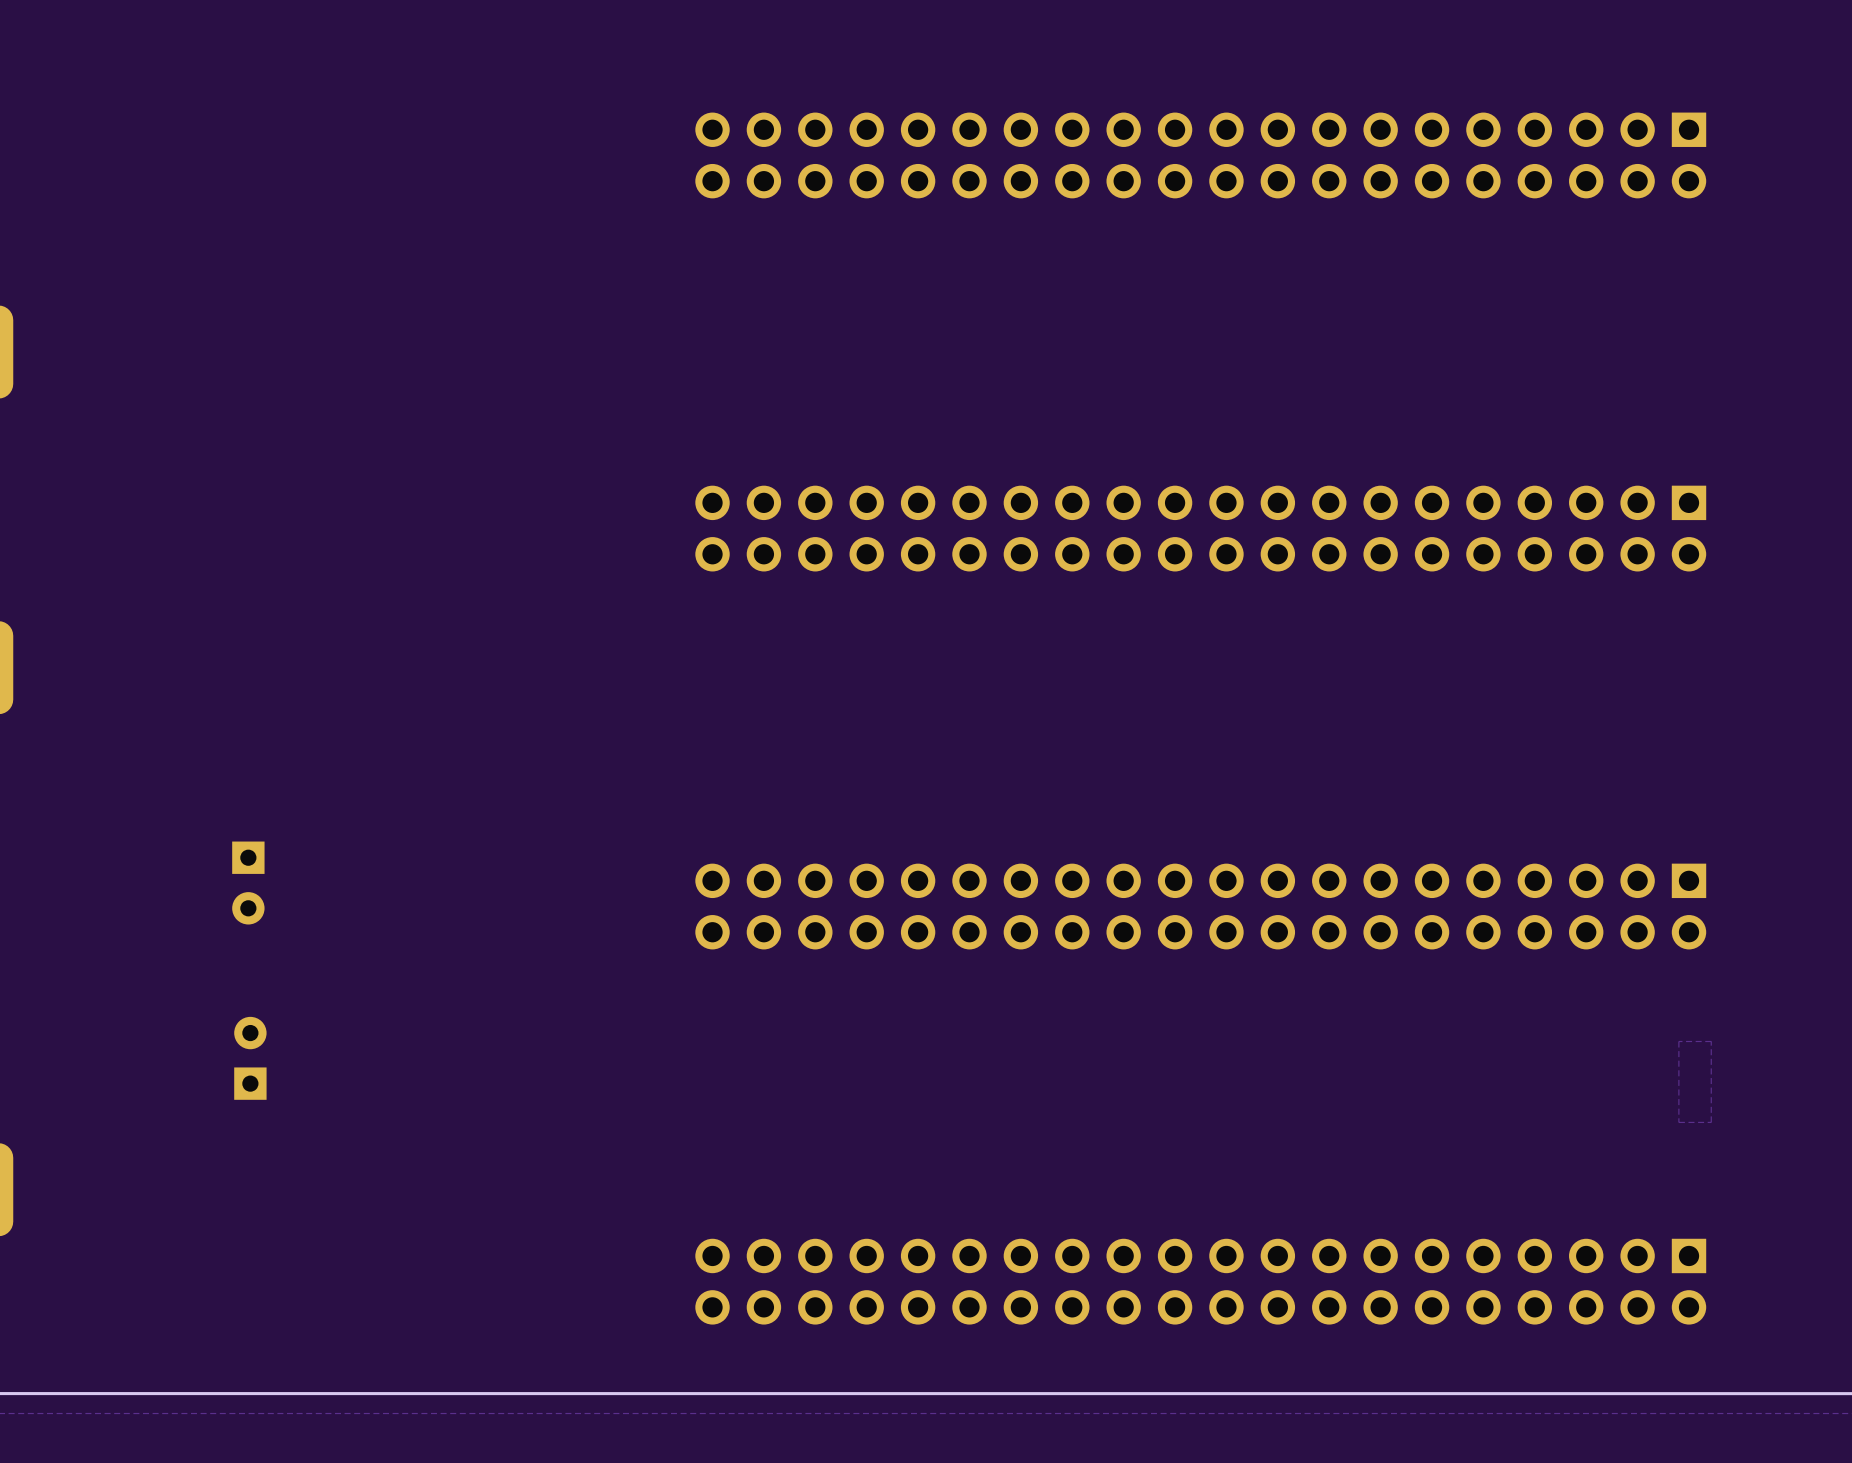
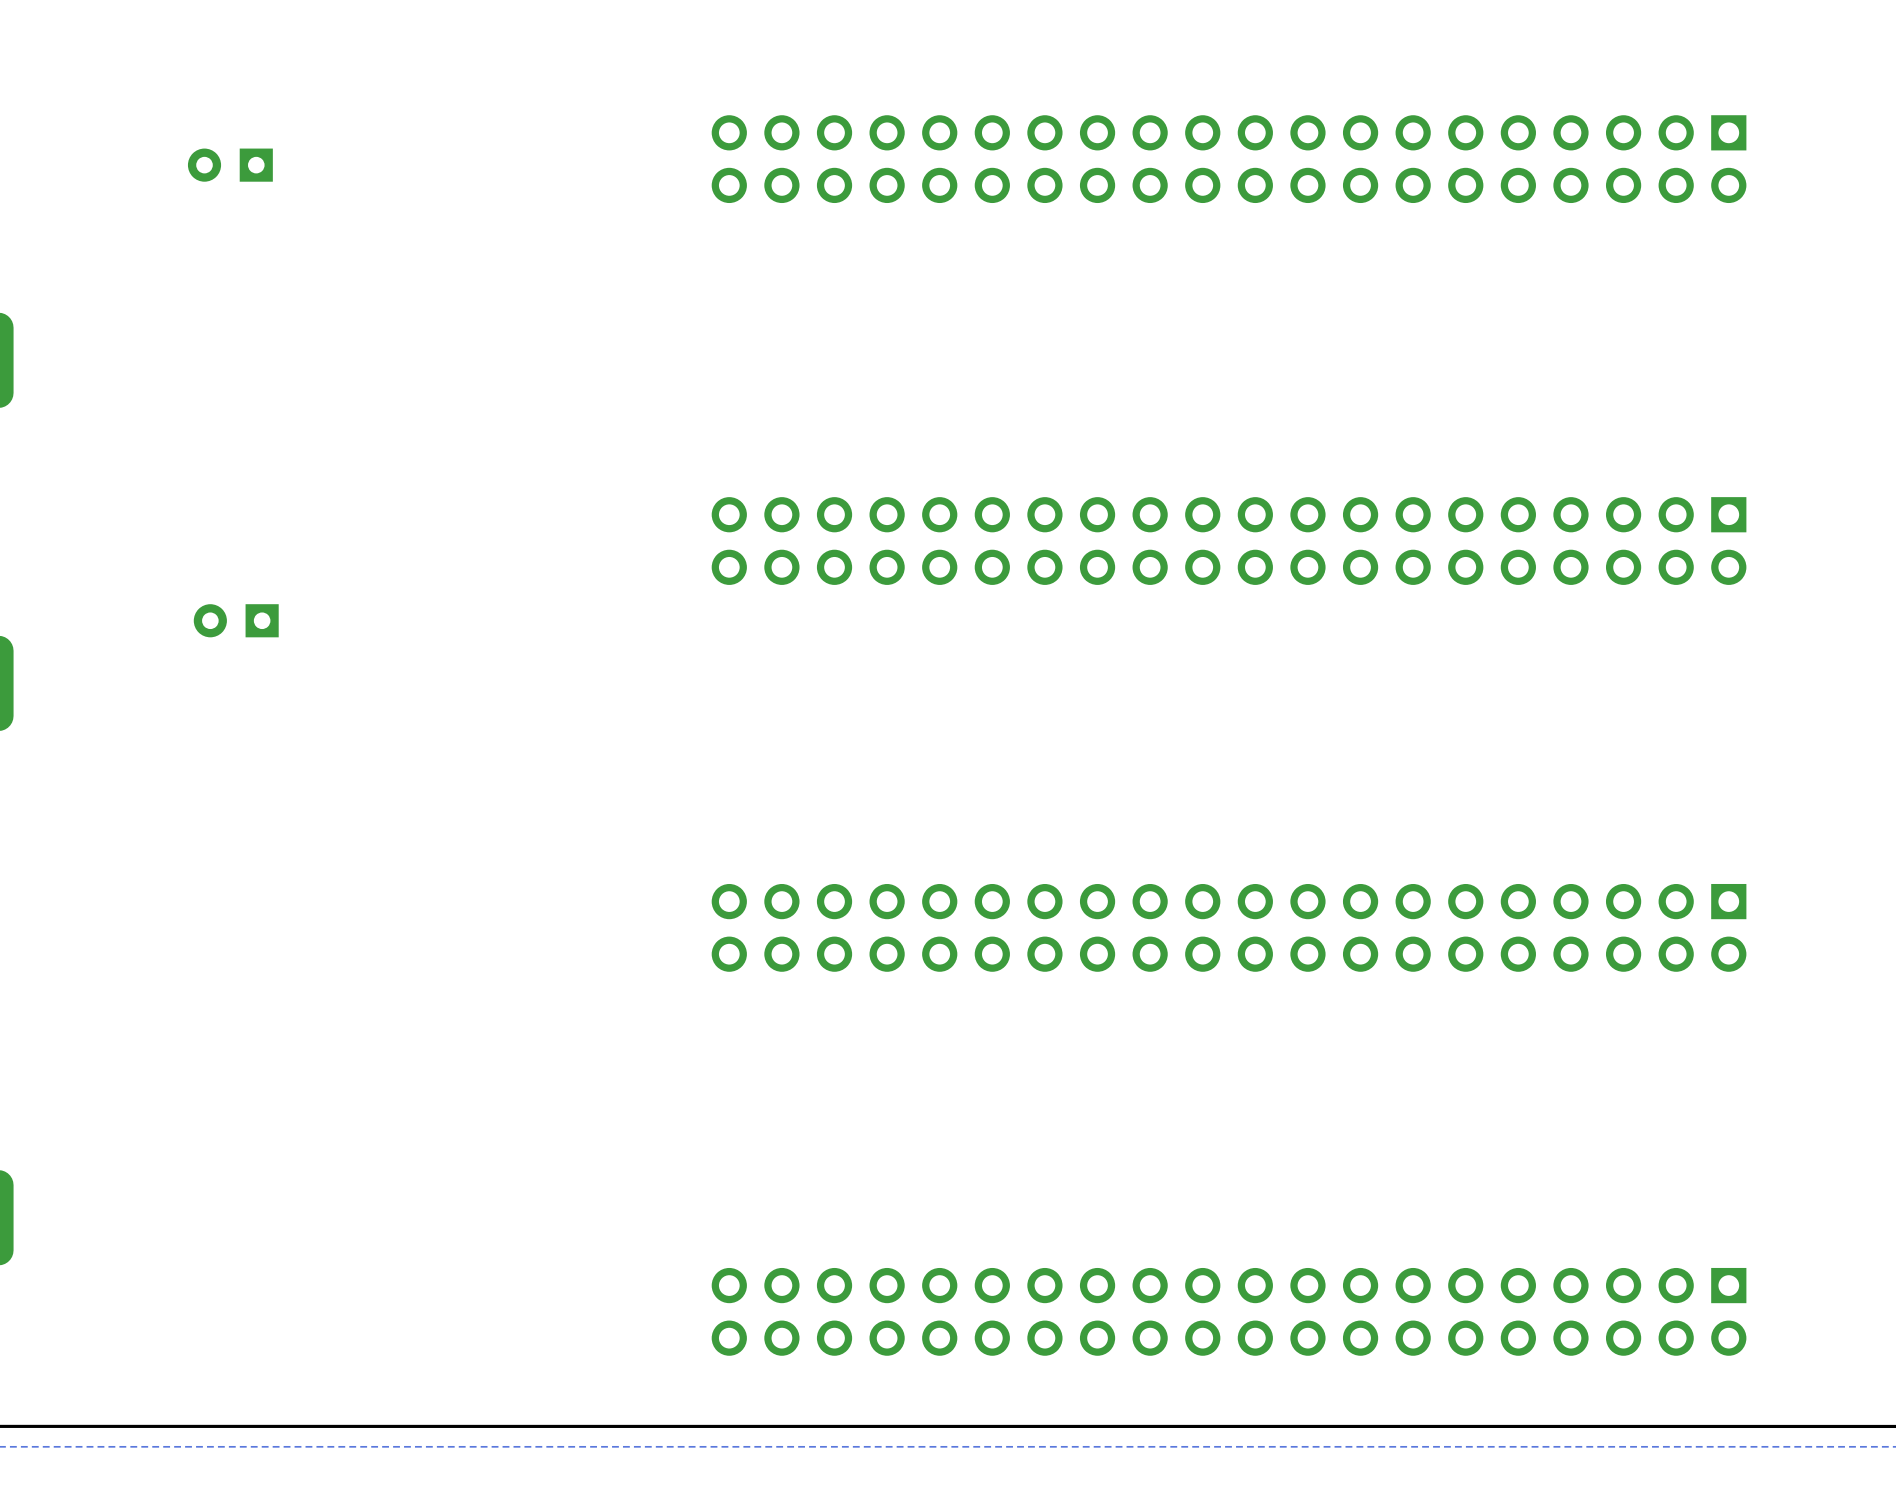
part: none -> (230, 165)
part: none -> (236, 620)
part: (248, 883) -> none
zone outline: (1711, 1041) (1711, 1122) (1678, 1122) (1678, 1041) (1711, 1041) -> none
part: (250, 1058) -> none

